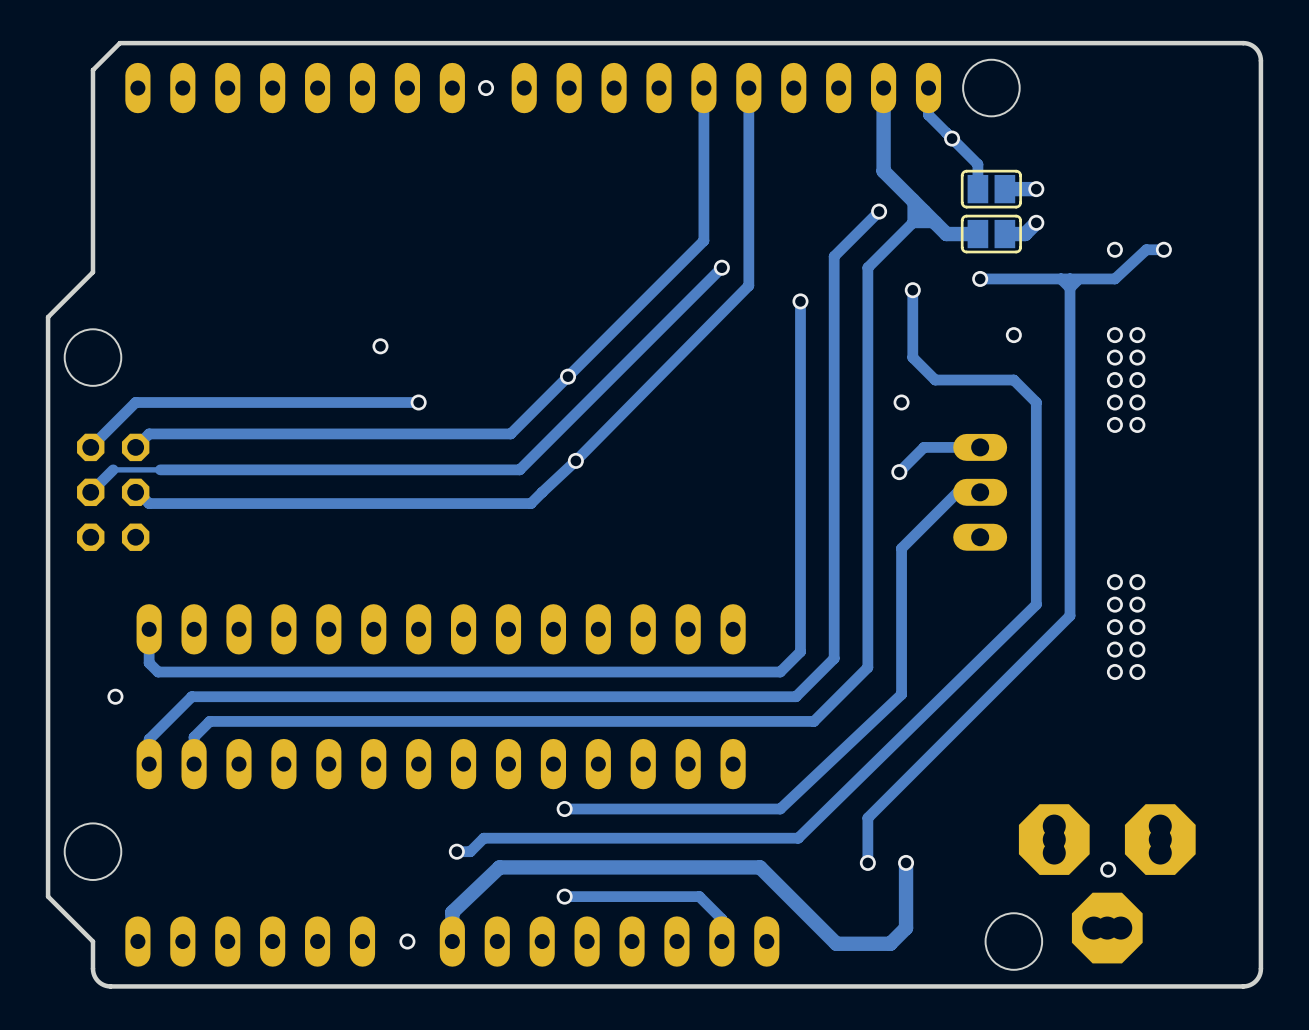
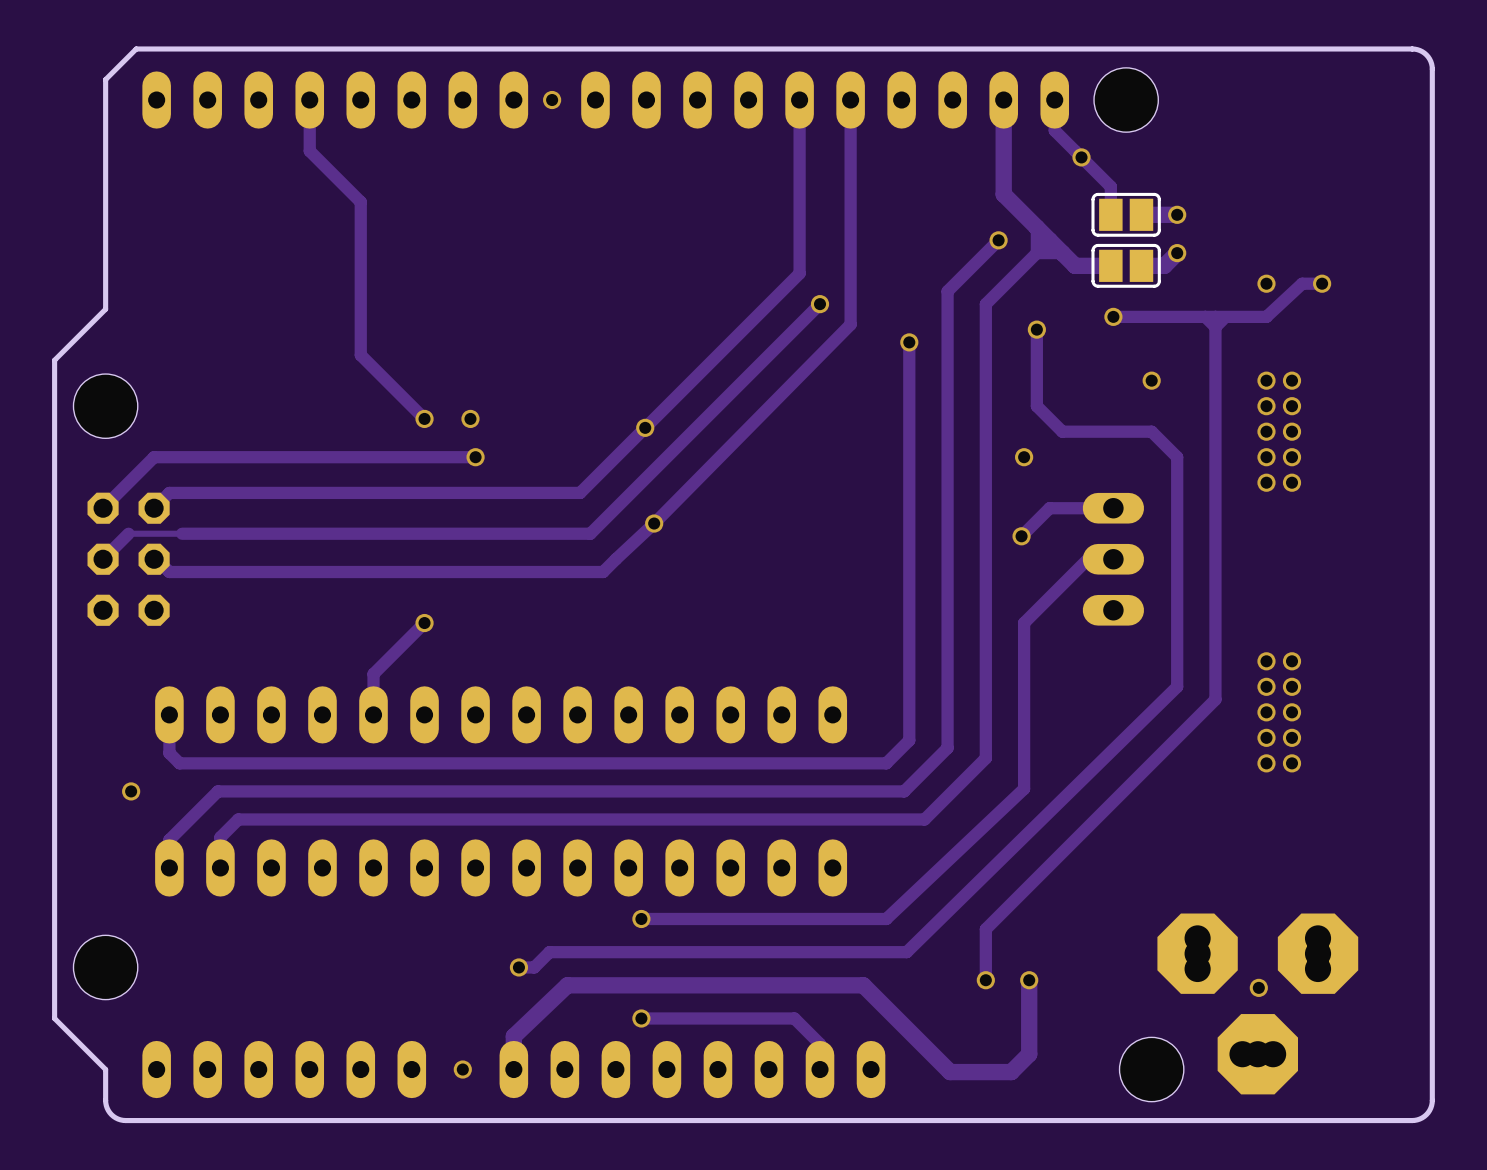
track: none -> (309, 100) (309, 151) (360, 202) (360, 355) (424, 418)
via: (380, 346) -> none
via: none -> (424, 418)
via: none -> (470, 418)
track: none -> (424, 623) (373, 674) (373, 714)
via: none -> (424, 623)

